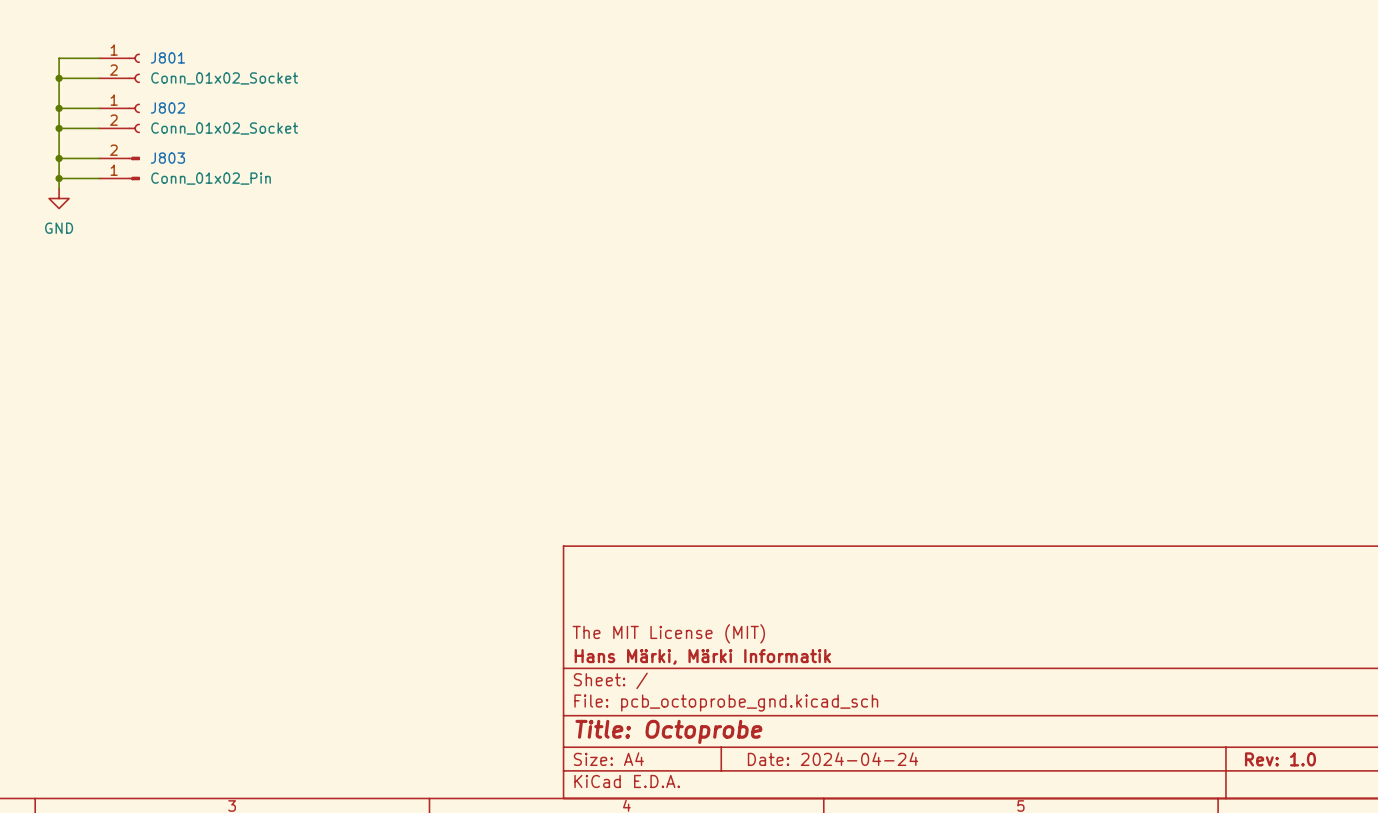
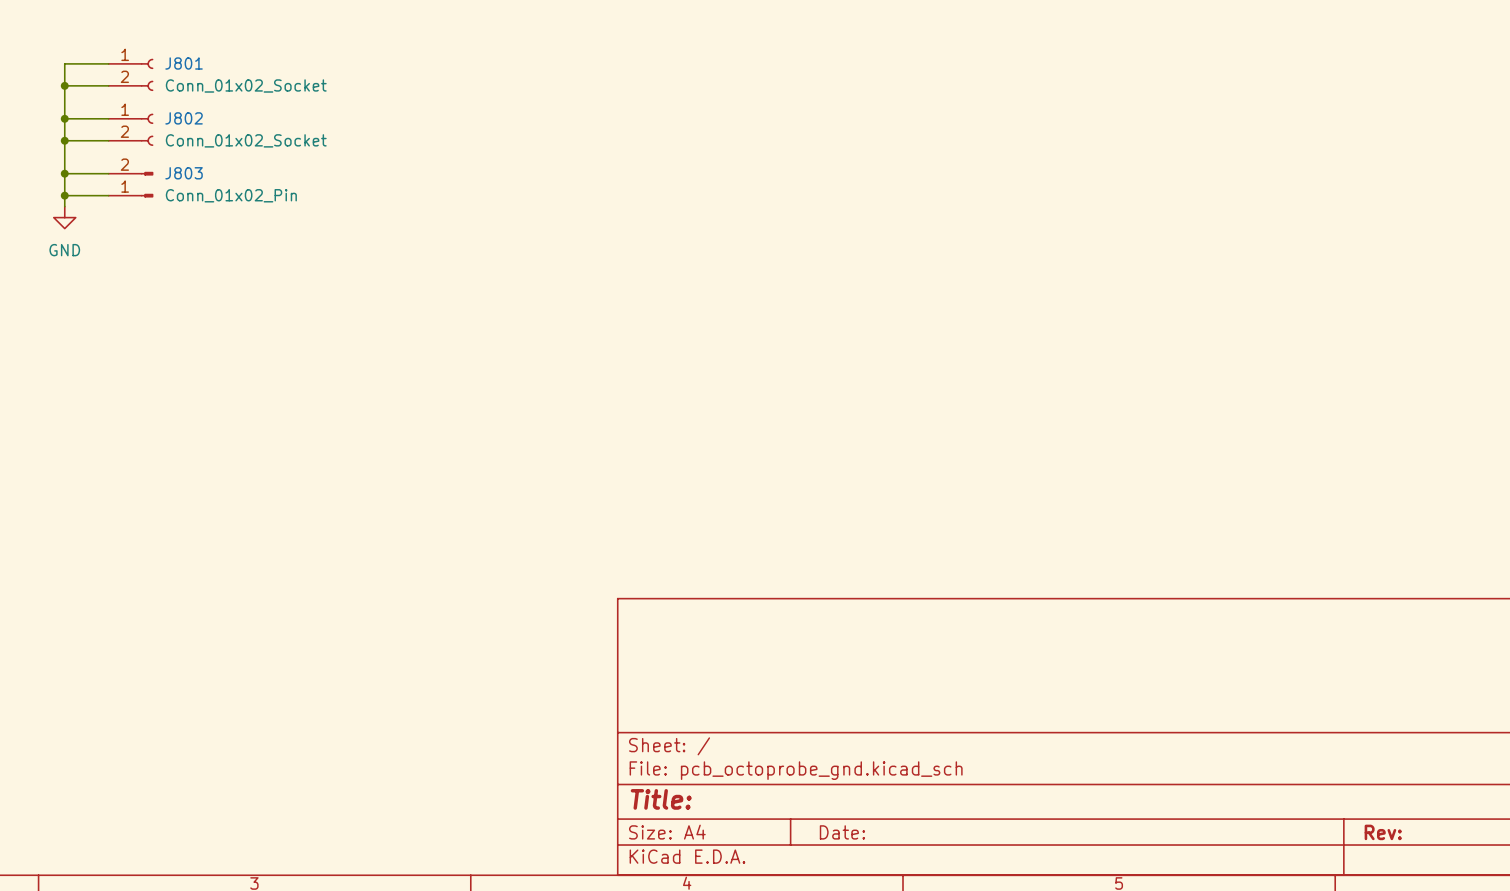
title block: The MIT License (MIT) (668, 633) -> none
title block: Hans Märki, Märki Informatik (702, 656) -> none
title block: Title: Octoprobe (668, 731) -> Title: (661, 799)
title block: Date: 2024-04-24 (833, 759) -> Date: (842, 832)
title block: Rev: 1.0 (1280, 759) -> Rev: (1383, 832)

